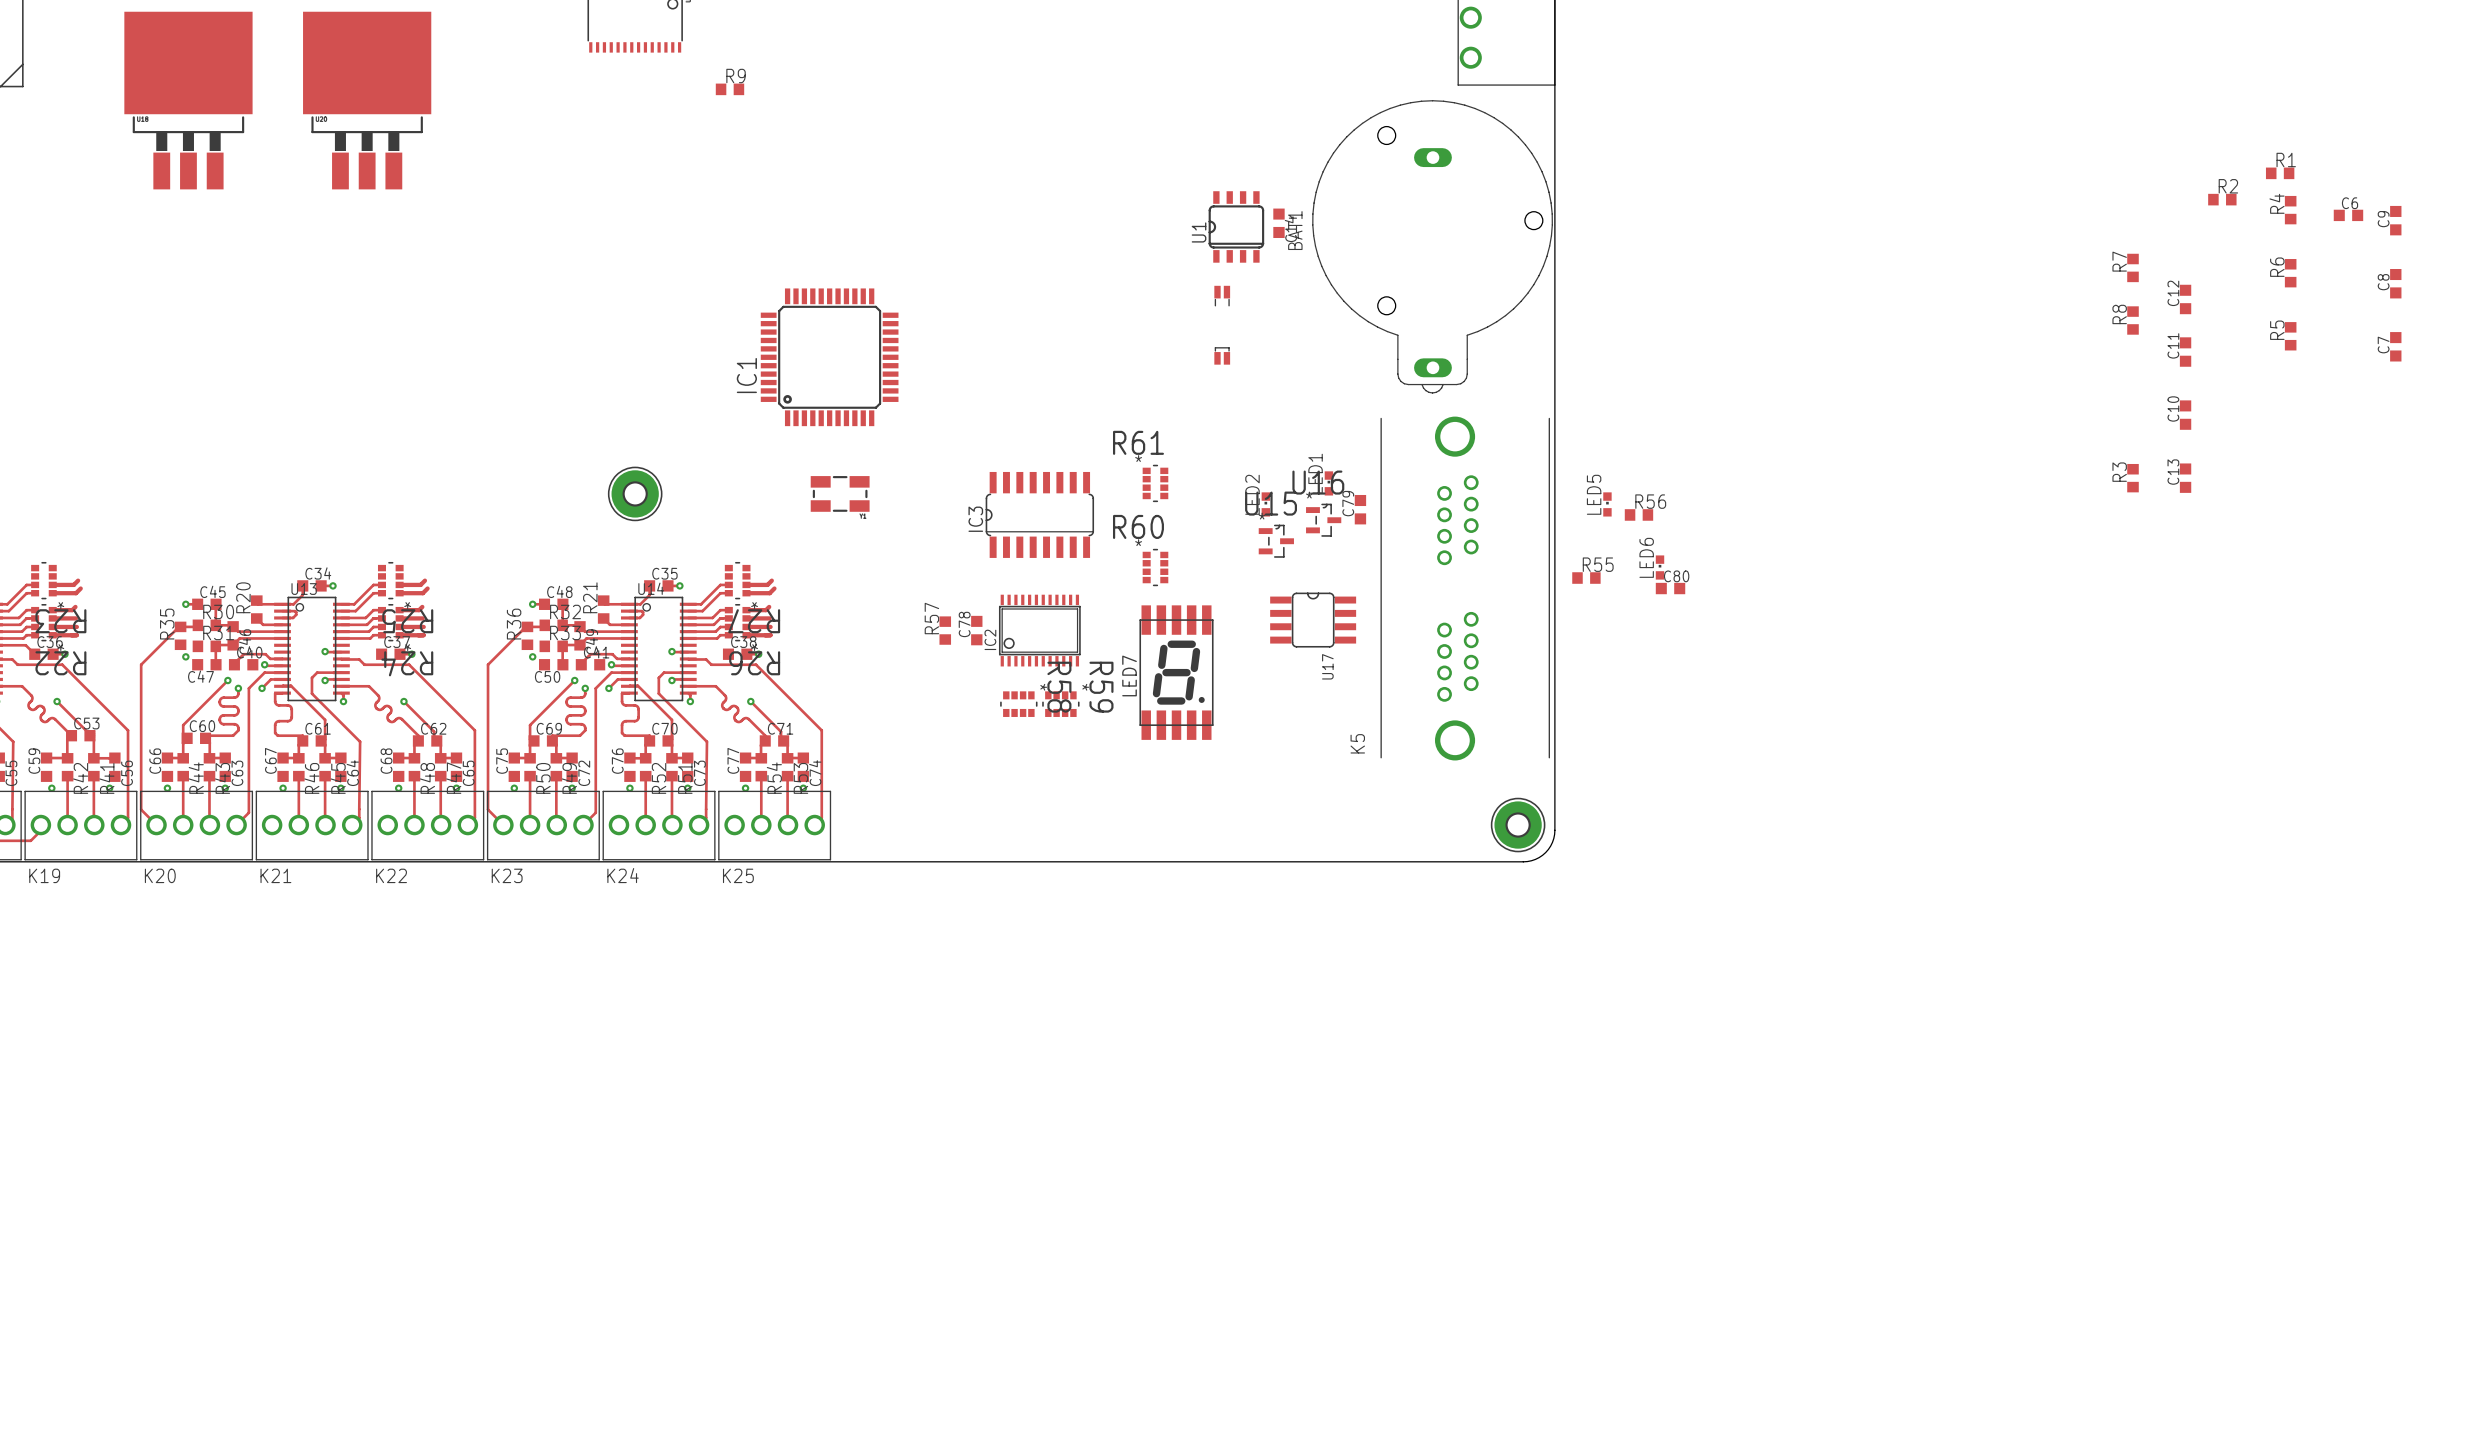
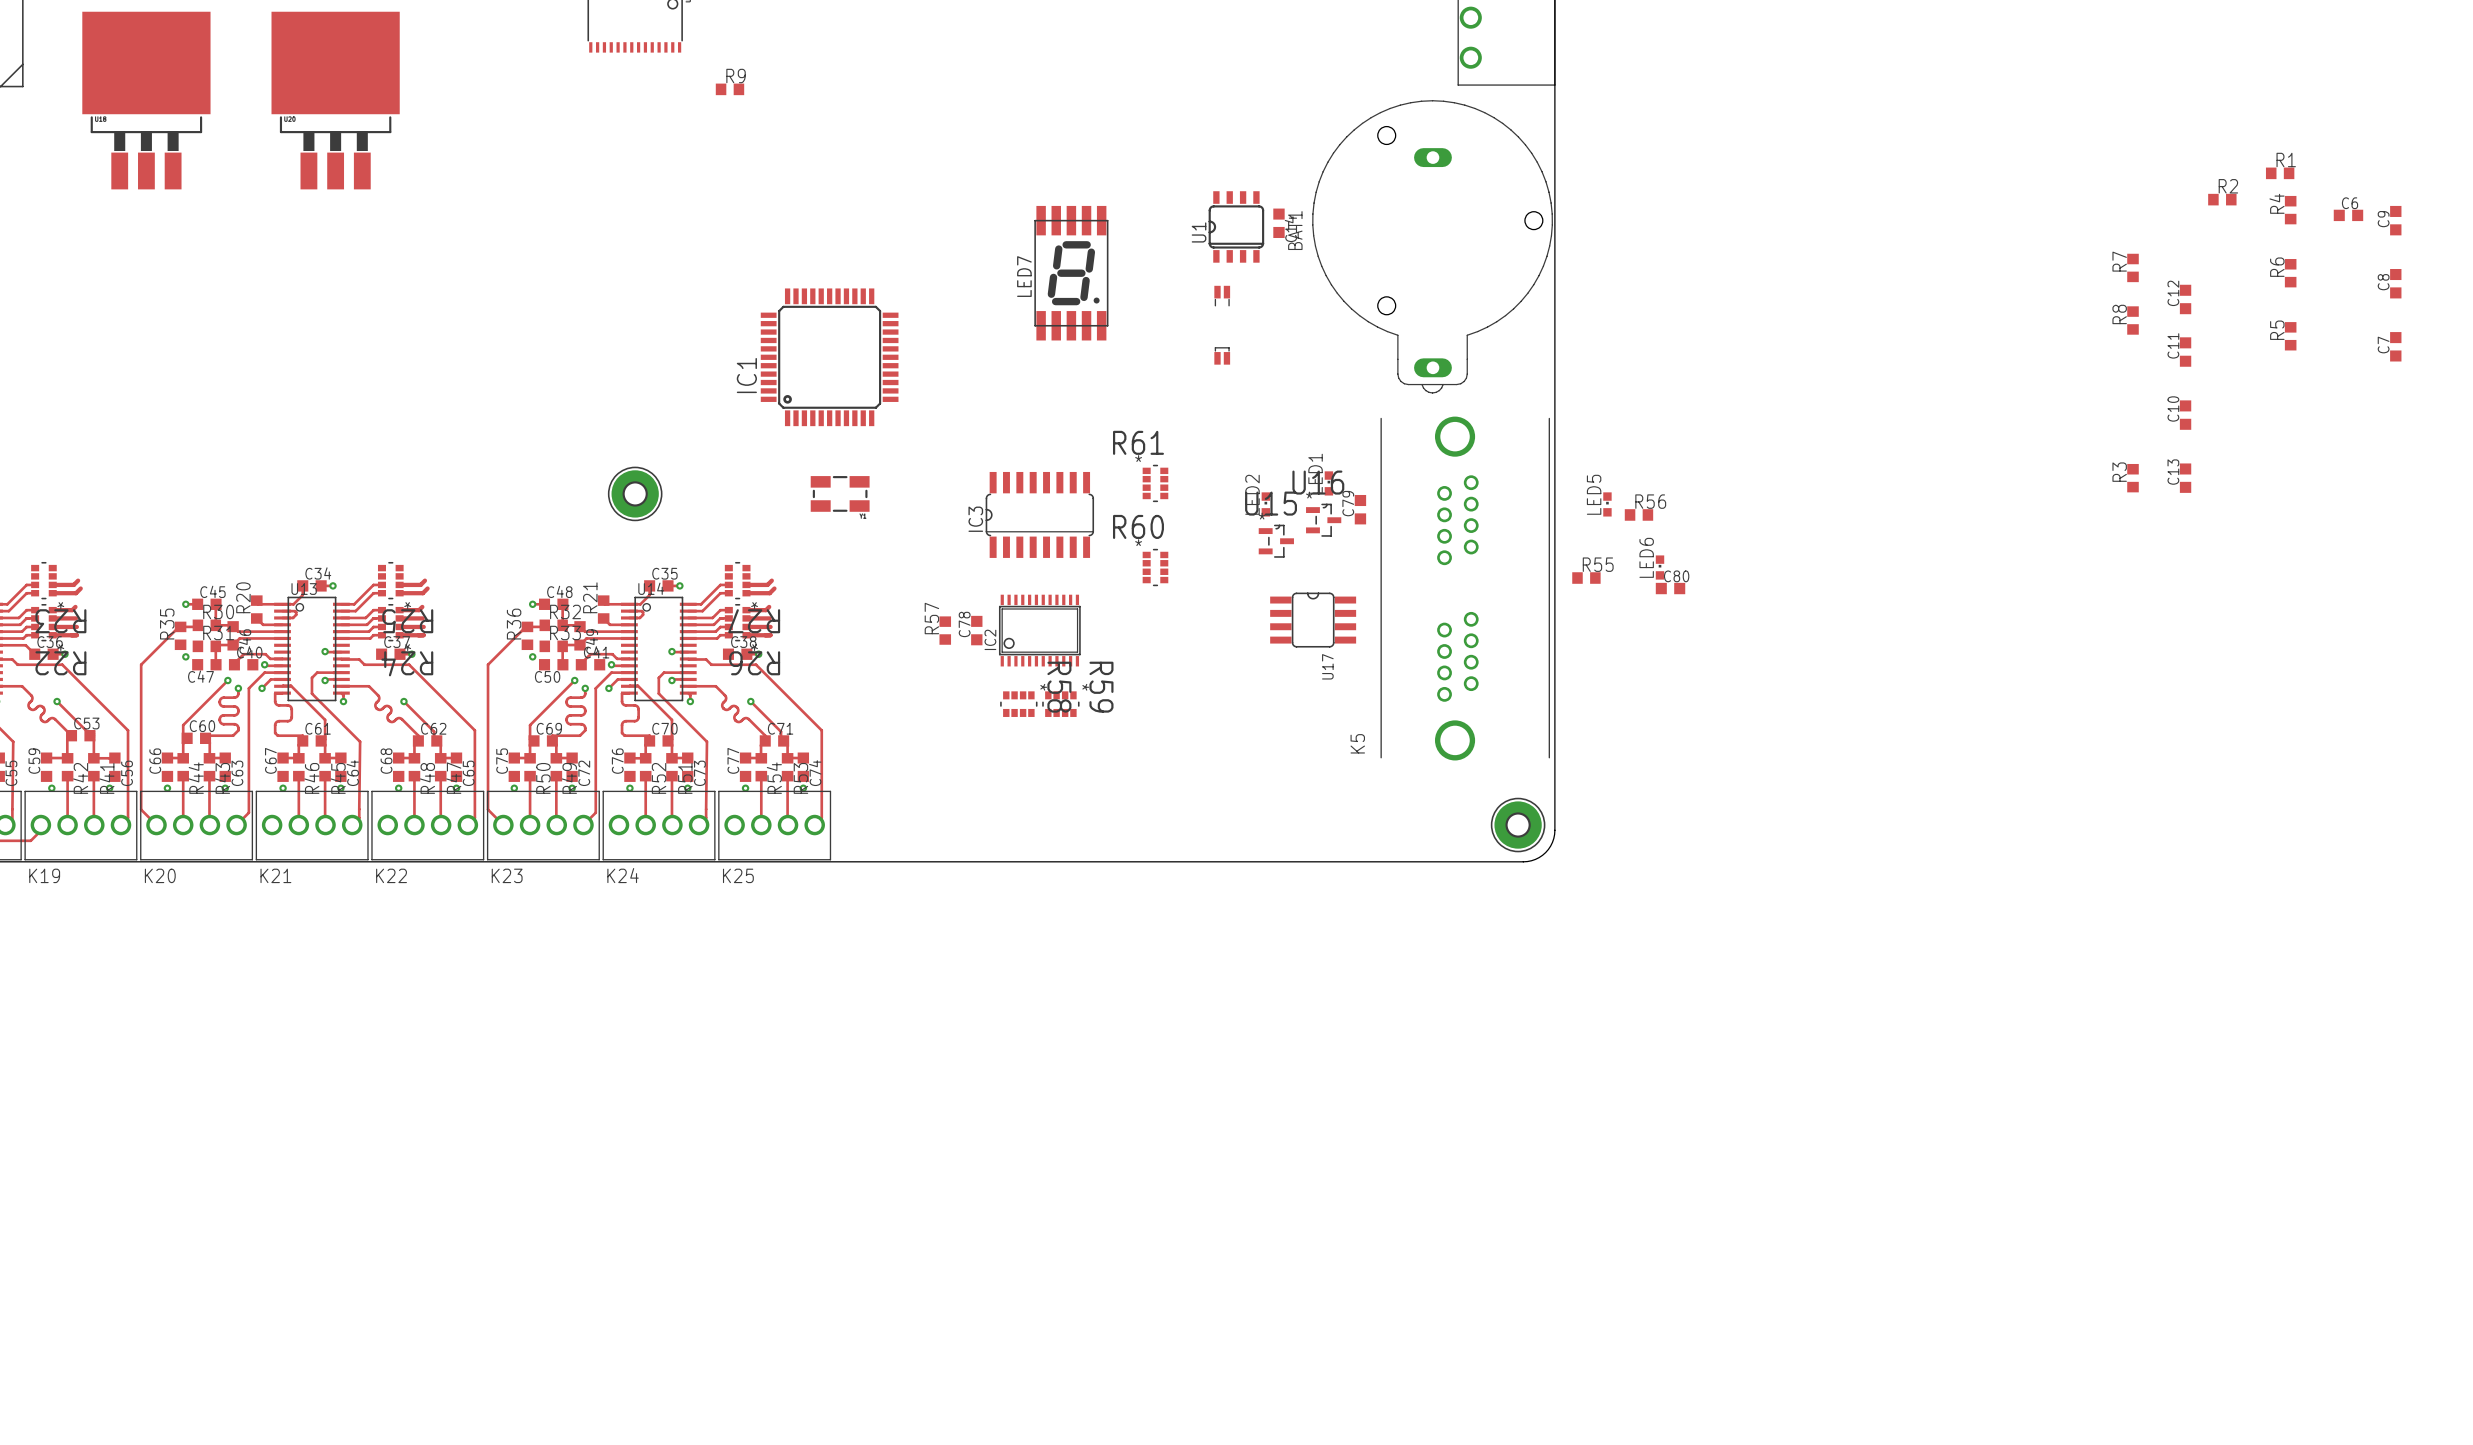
part position: (188, 100) -> (146, 100)
part position: (367, 100) -> (335, 100)
LED7 position: (1176, 672) -> (1071, 273)

